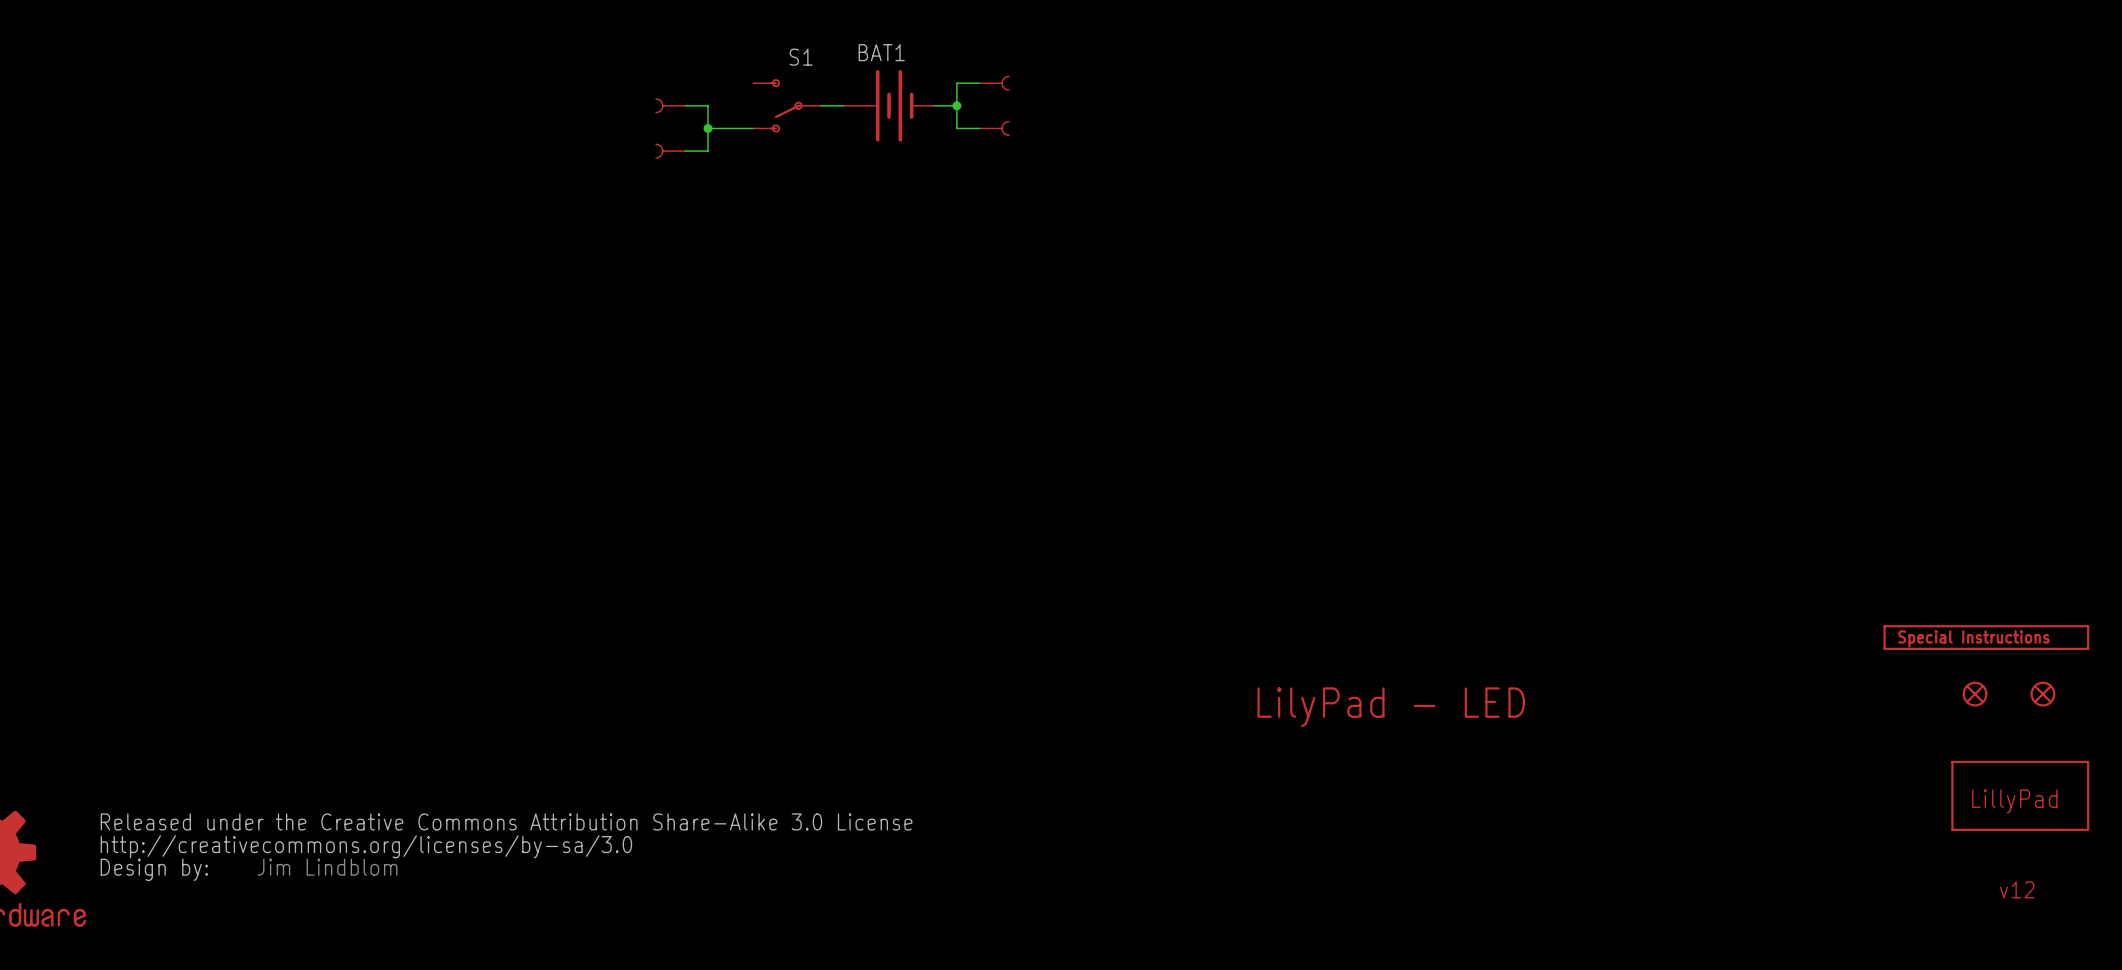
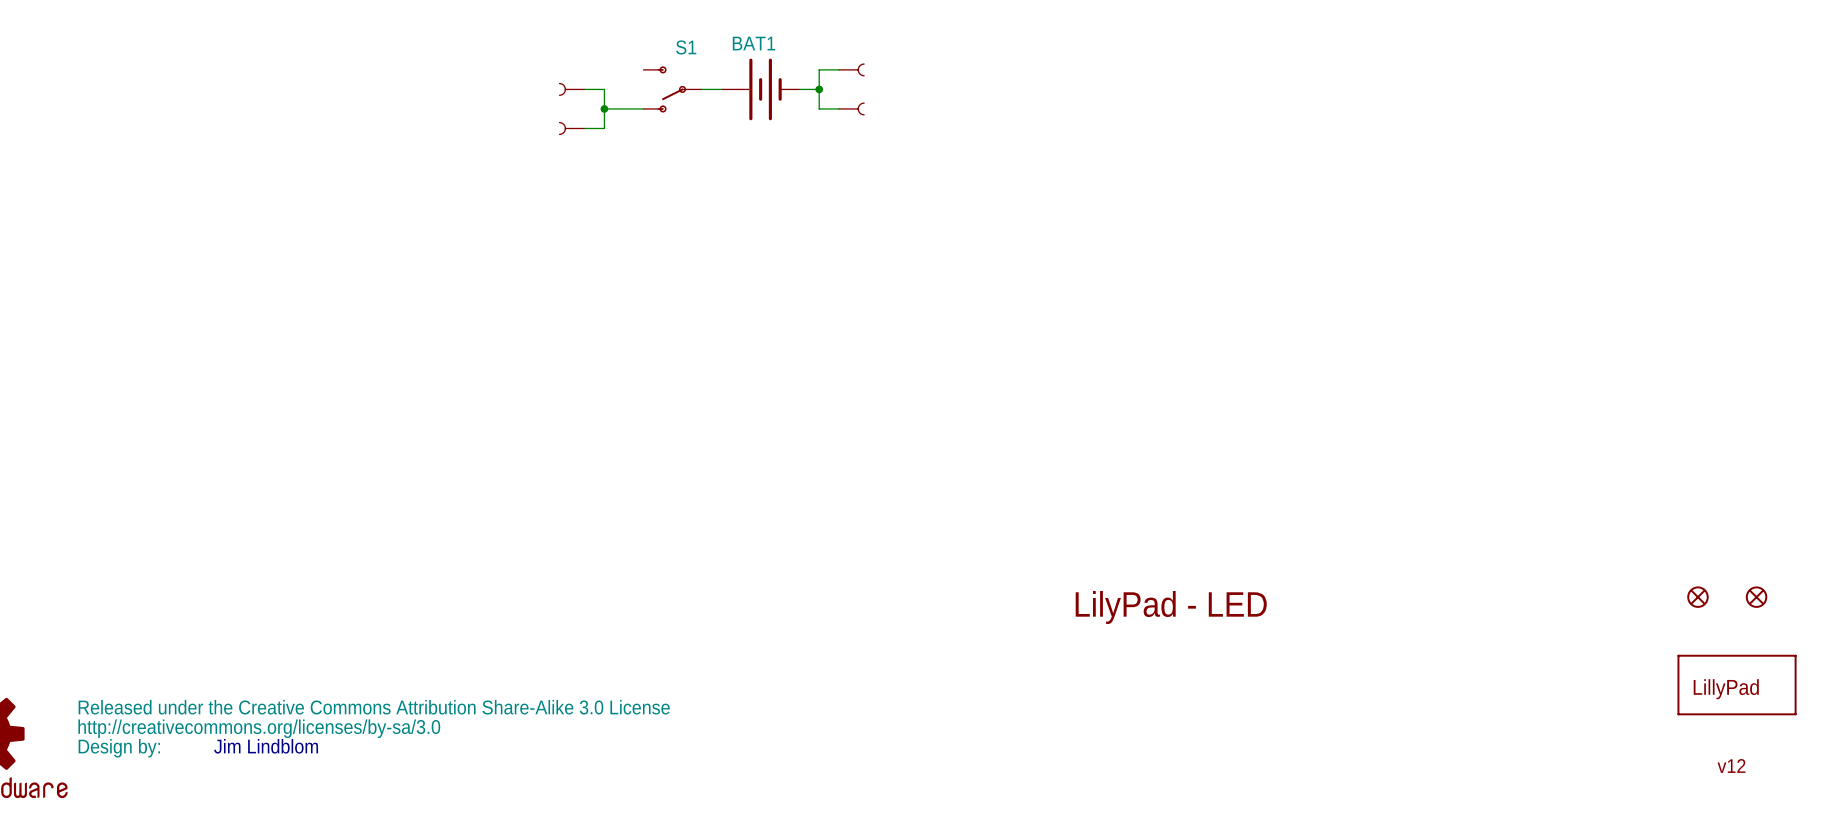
part: (1986, 637) -> none

